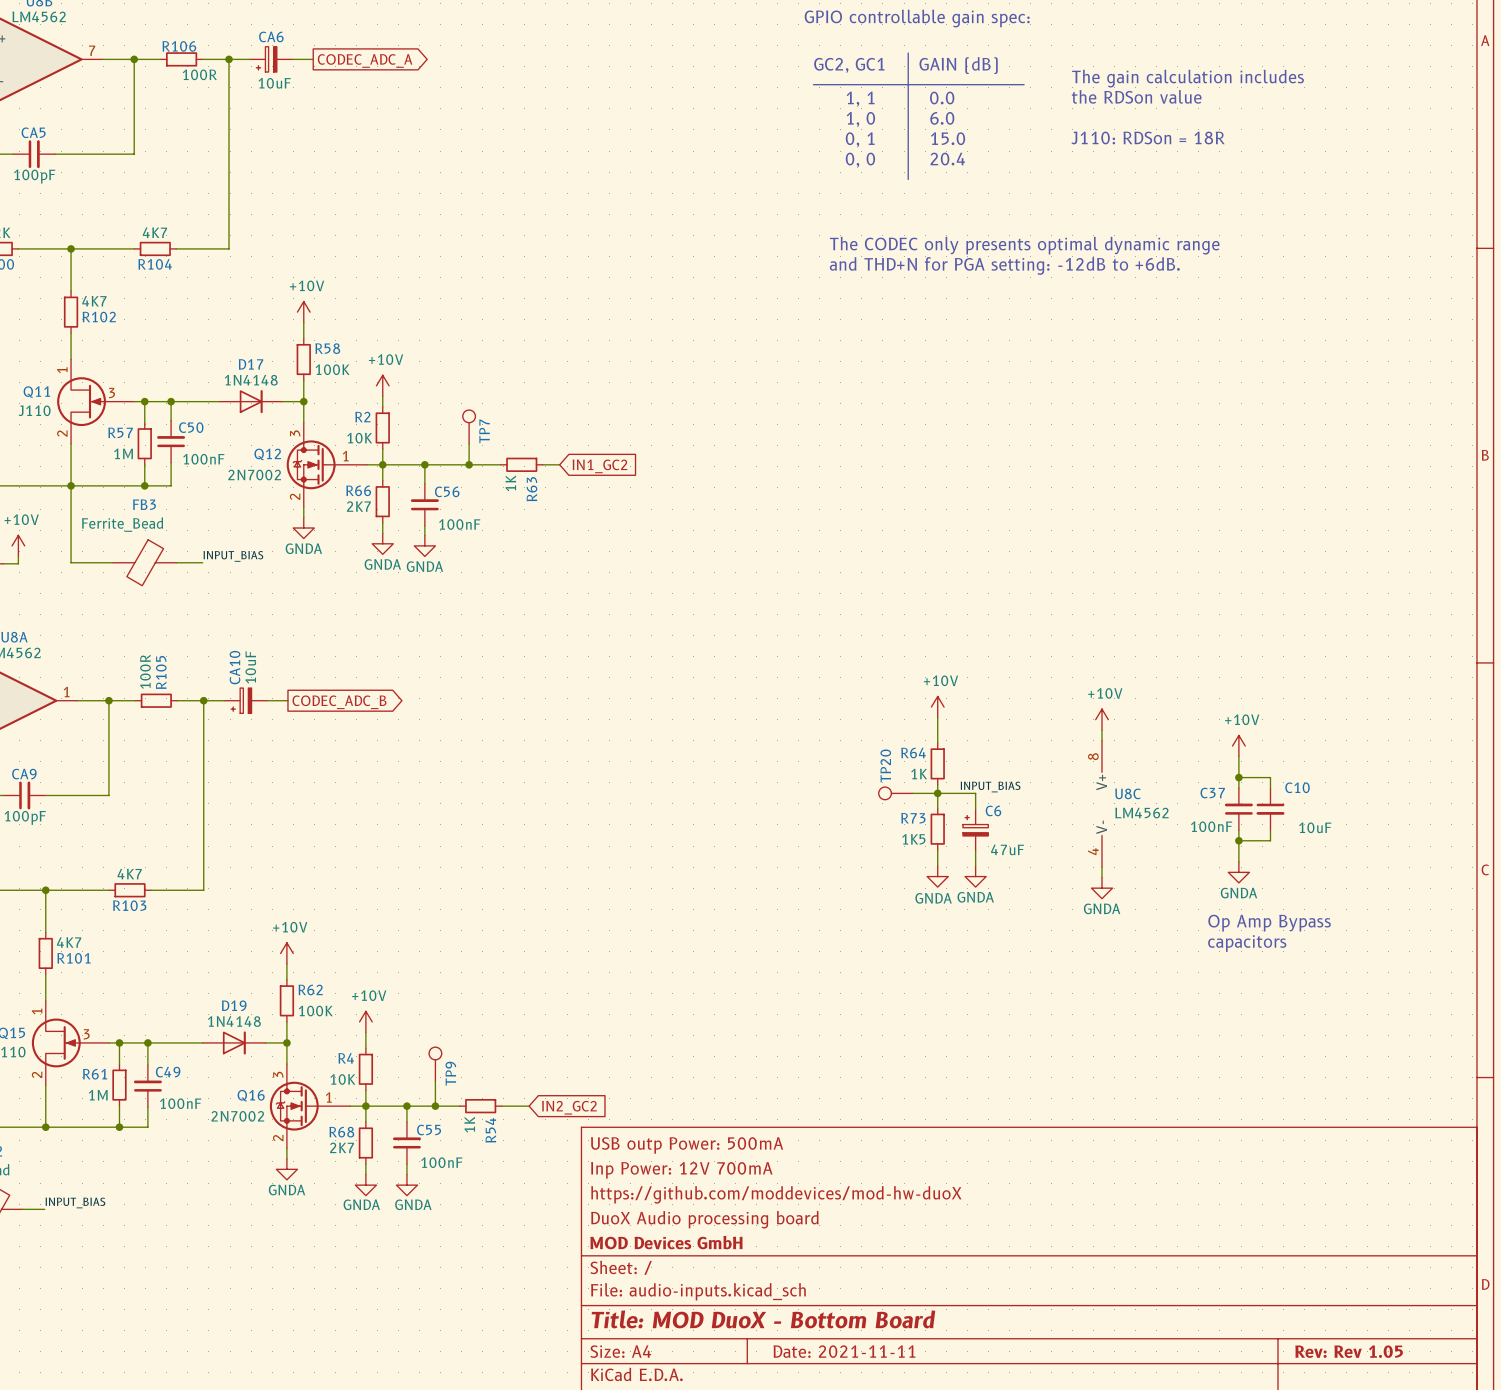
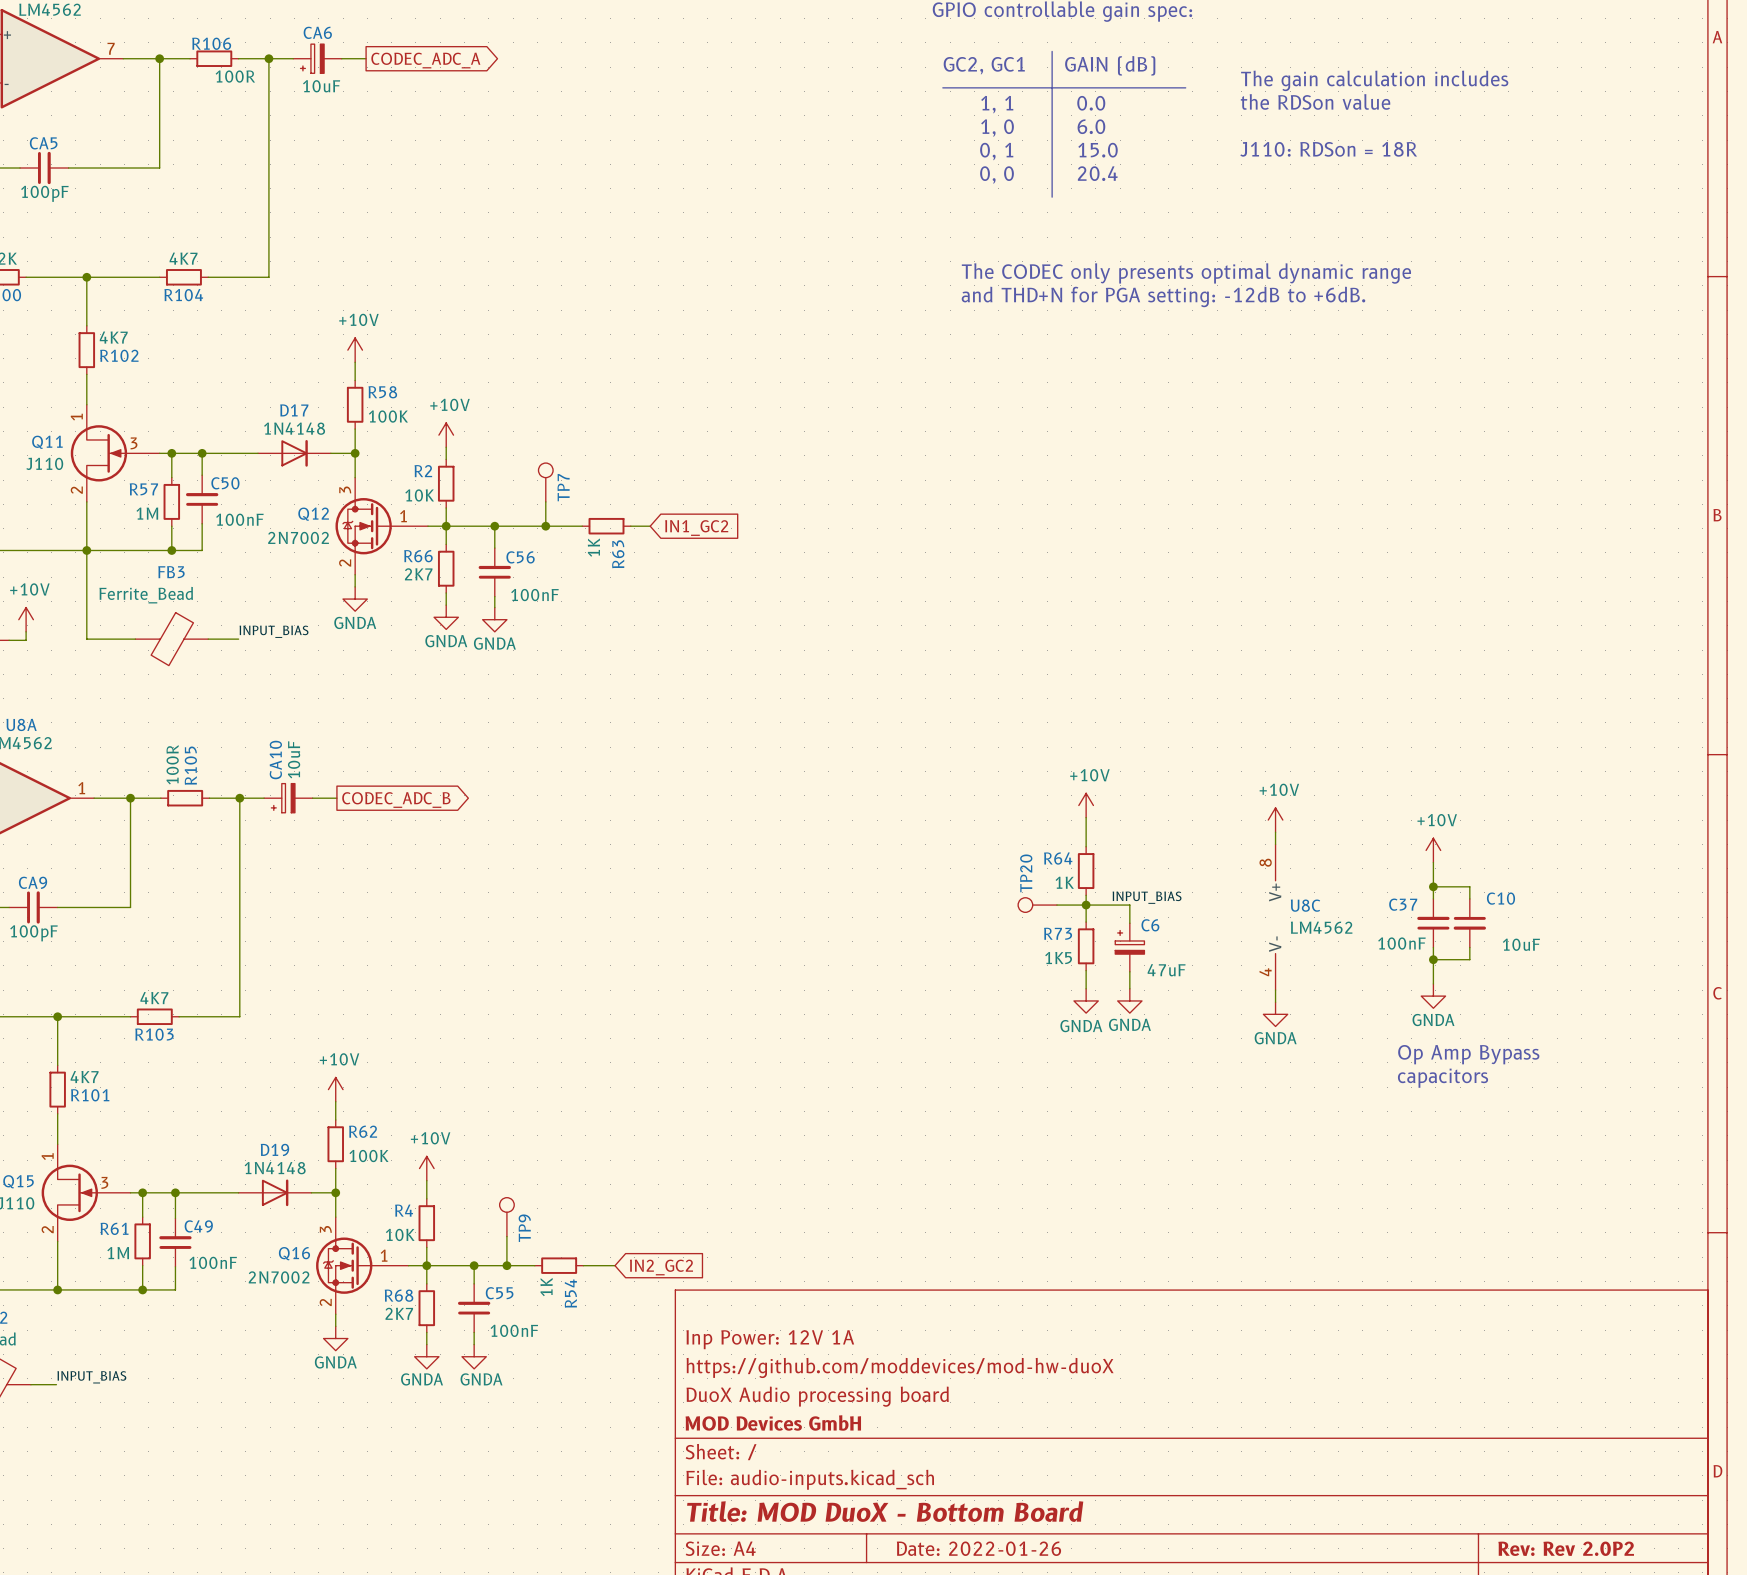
title block: USB outp Power: 500mA (687, 1145) -> none
title block: Inp Power: 12V 700mA (681, 1170) -> Inp Power: 12V 1A (770, 1339)
title block: Date: 2021-11-11 (844, 1351) -> Date: 2022-01-26 (978, 1548)
title block: Rev: Rev 1.05 (1349, 1351) -> Rev: Rev 2.0P2 (1566, 1548)

